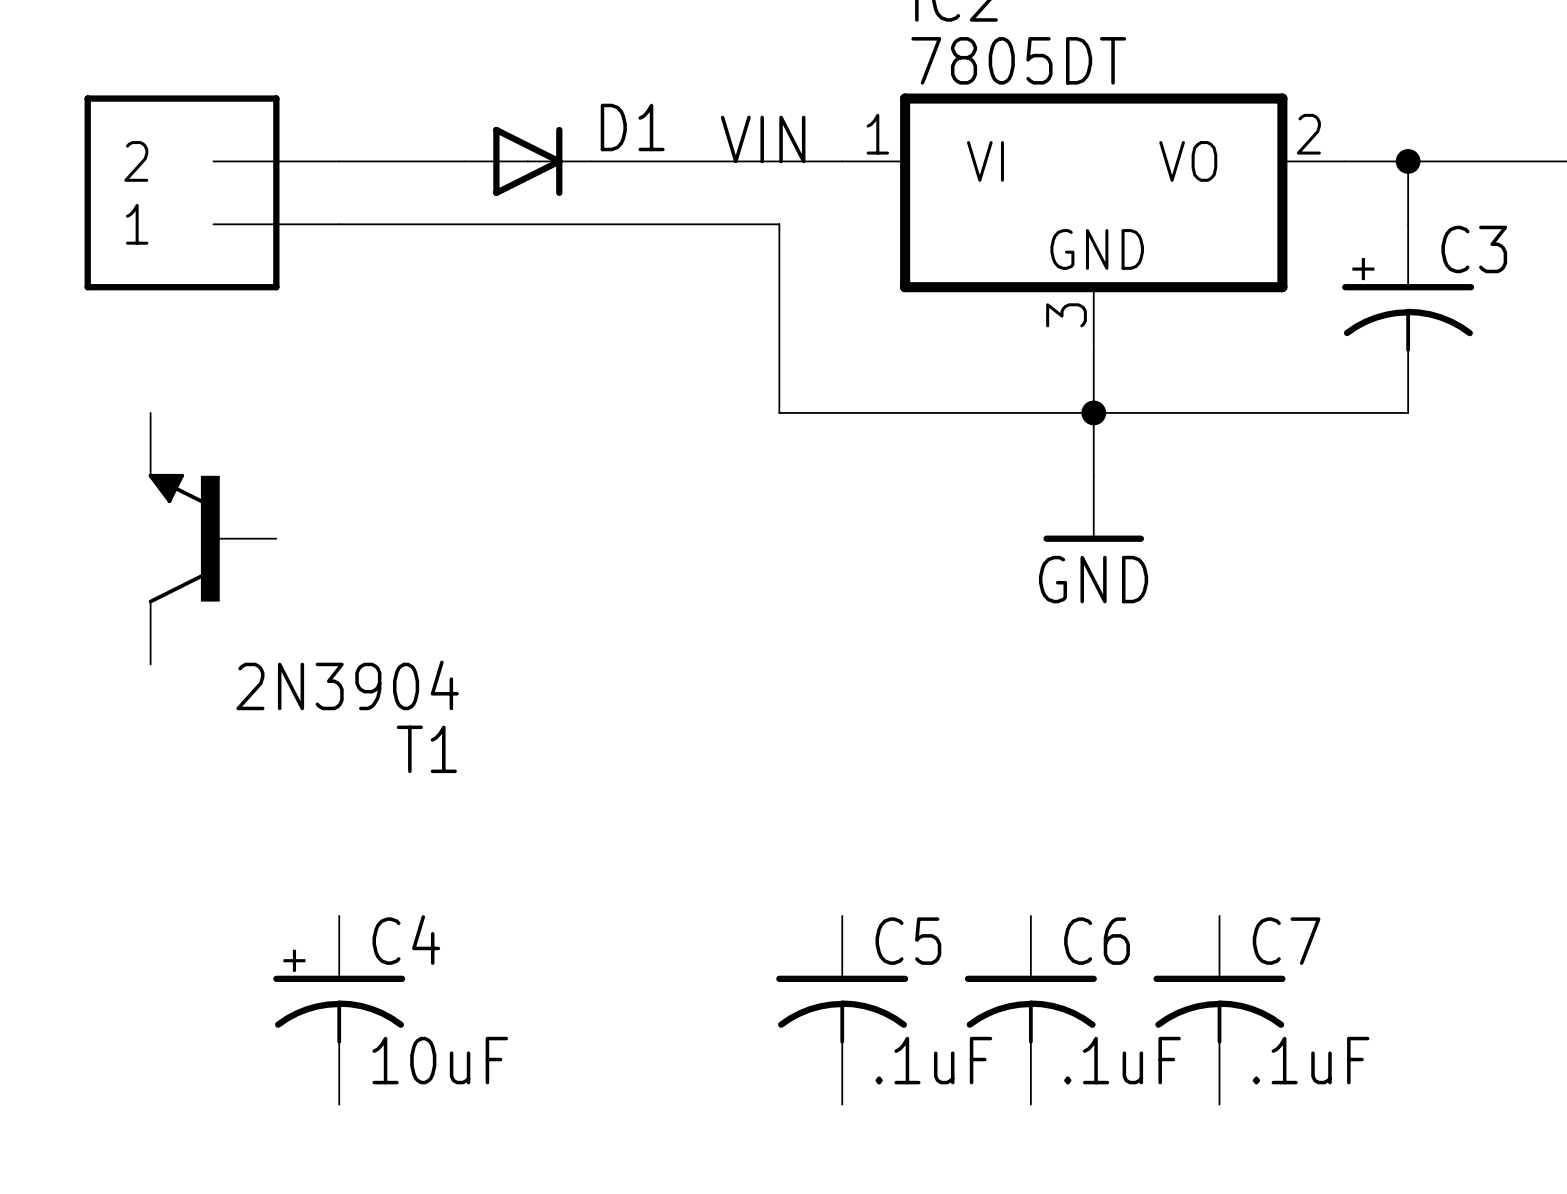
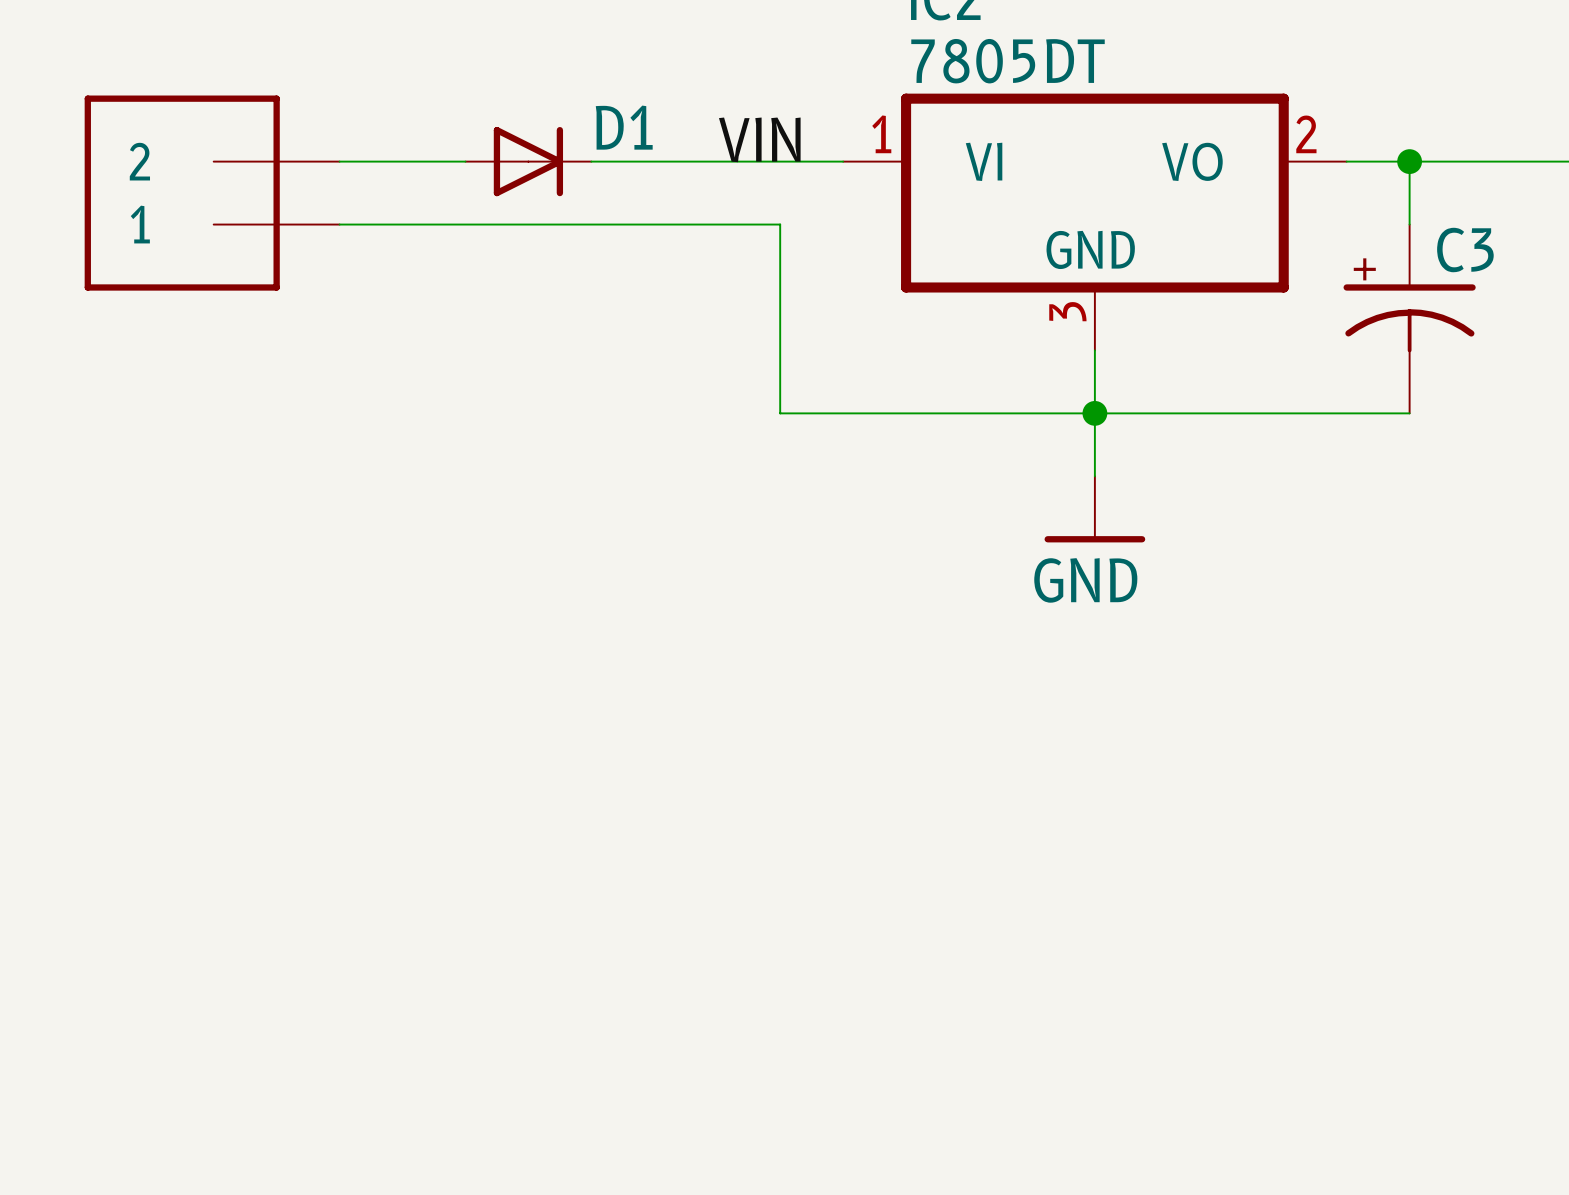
T1: 2N3904 (212, 538) -> none
C4: 10uF (339, 1010) -> none
C5: .1uF (842, 1010) -> none
C6: .1uF (1030, 1010) -> none
C7: .1uF (1219, 1010) -> none

